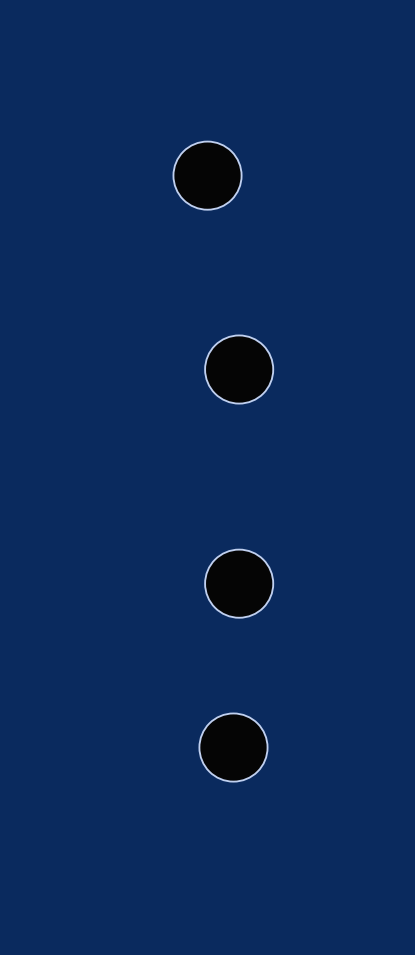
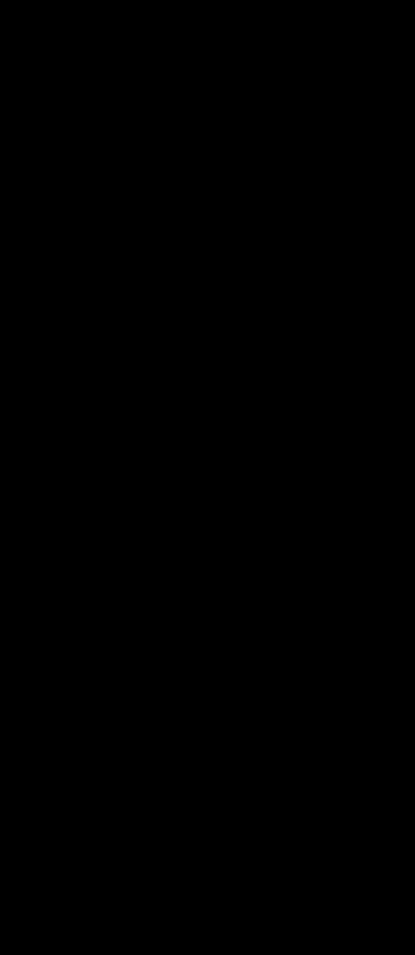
part: (207, 175) -> none
part: (239, 369) -> none
part: (239, 583) -> none
part: (233, 747) -> none

